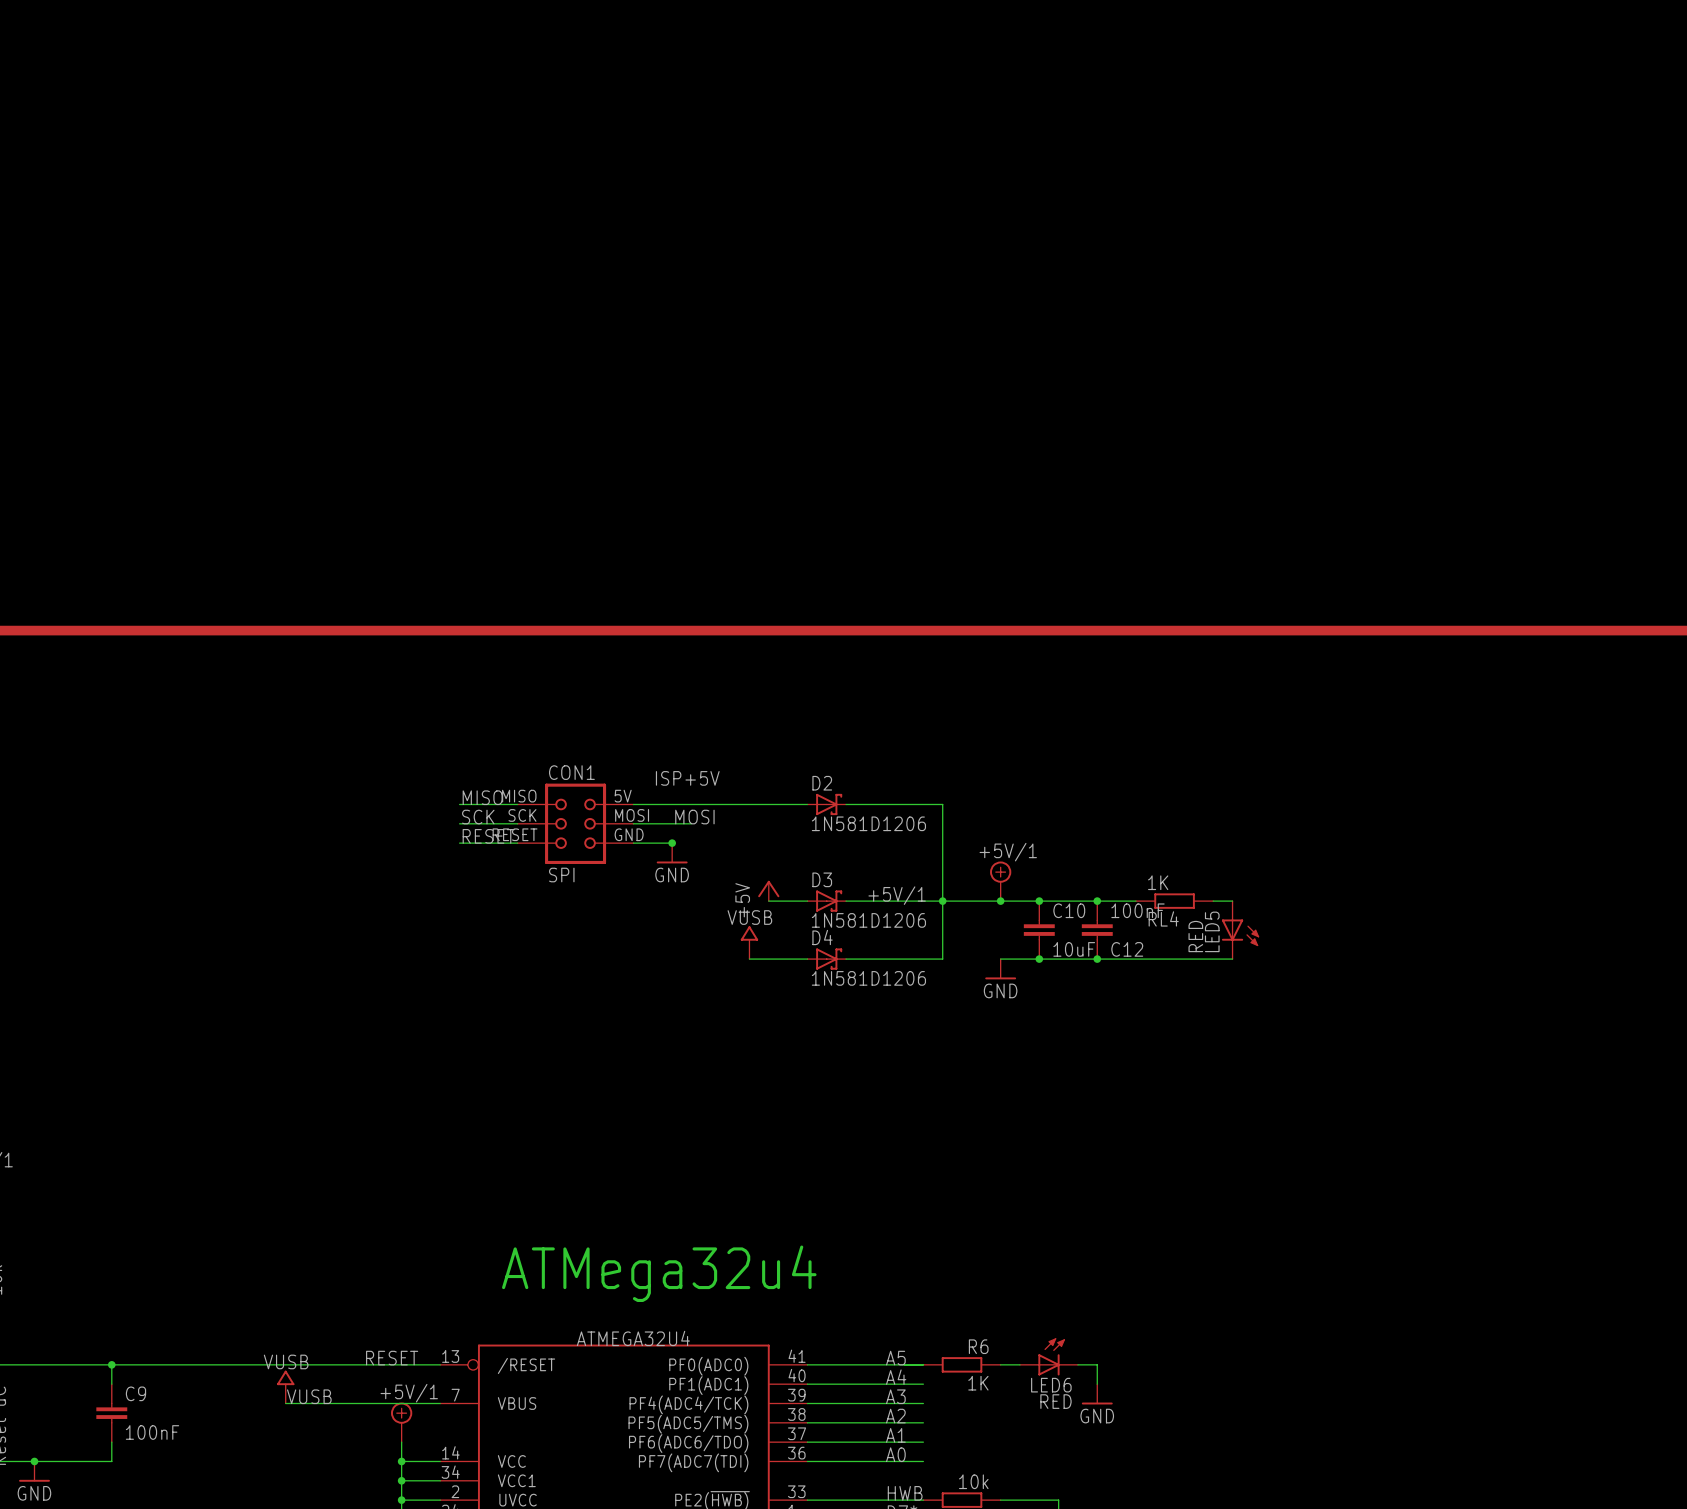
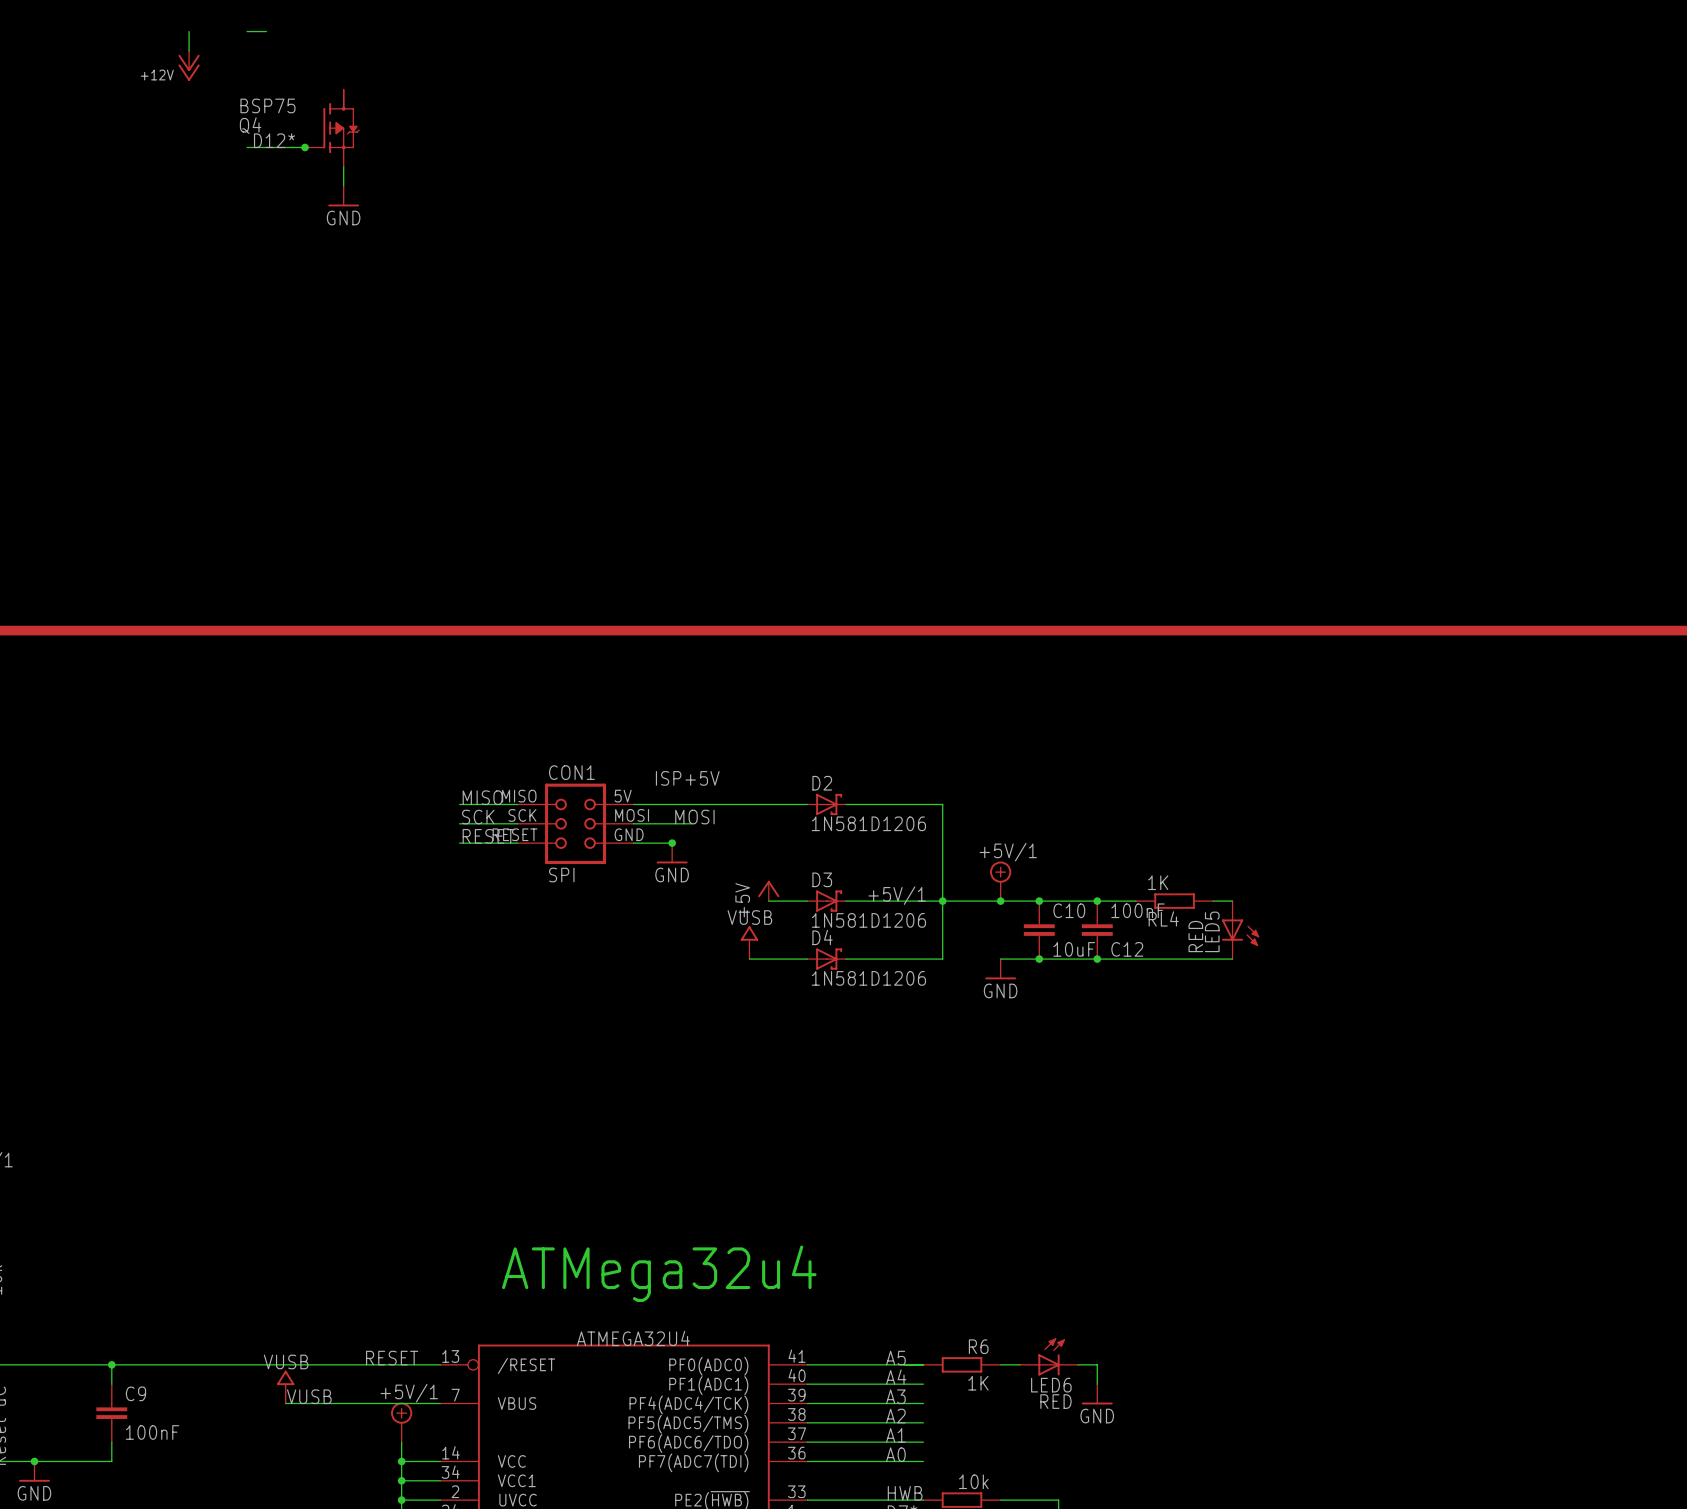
wire: none -> (189, 31) (189, 50)
wire: none -> (247, 31) (266, 31)
power symbol: none -> +12V (189, 65)
Q4: none -> BSP75 (332, 128)
label: none -> D12* (274, 140)
wire: none -> (247, 147) (305, 147)
junction: none -> (305, 147)
wire: none -> (343, 166) (343, 186)
power symbol: none -> GND (343, 196)

